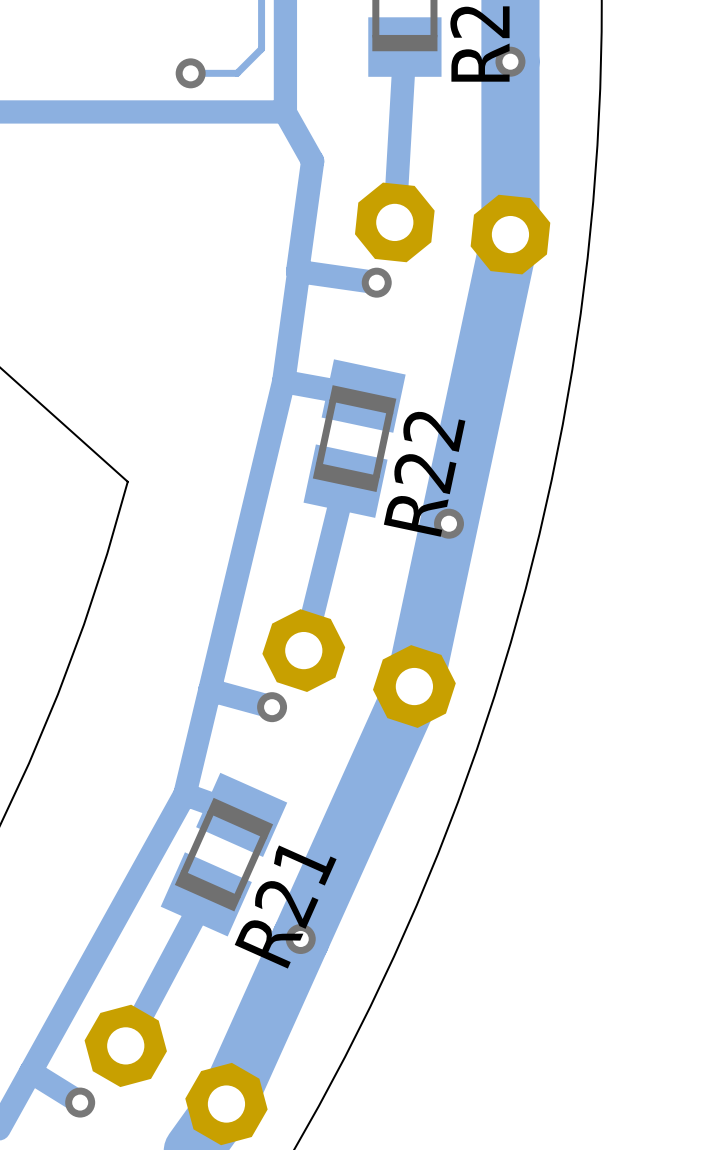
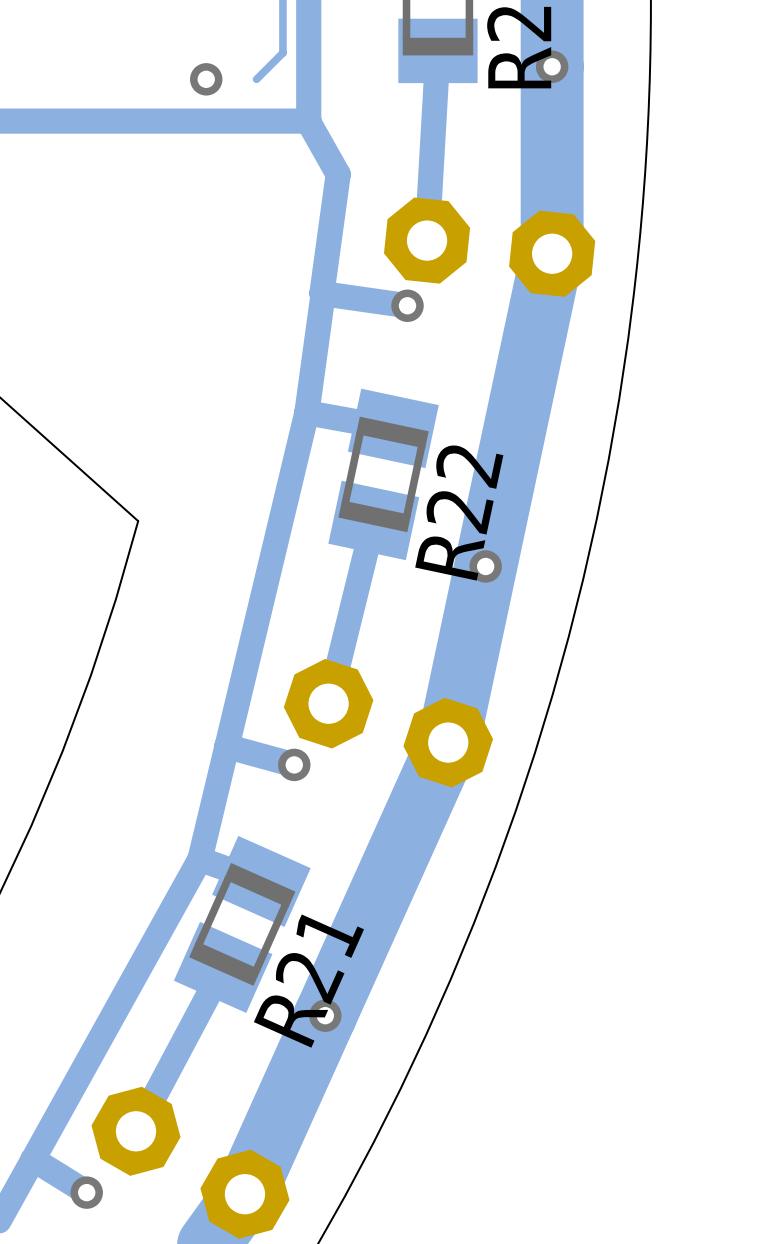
track: (237, 73) (190, 73) -> none

